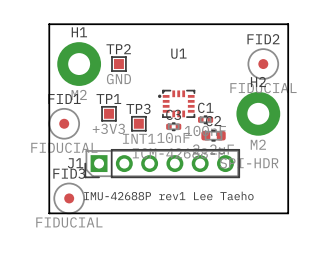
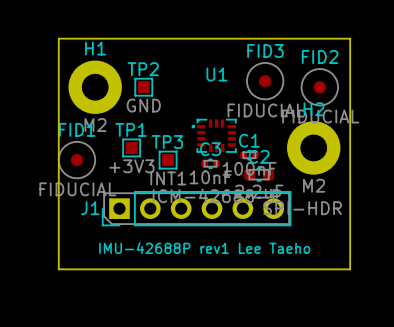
FID3 position: (69, 198) -> (265, 81)

